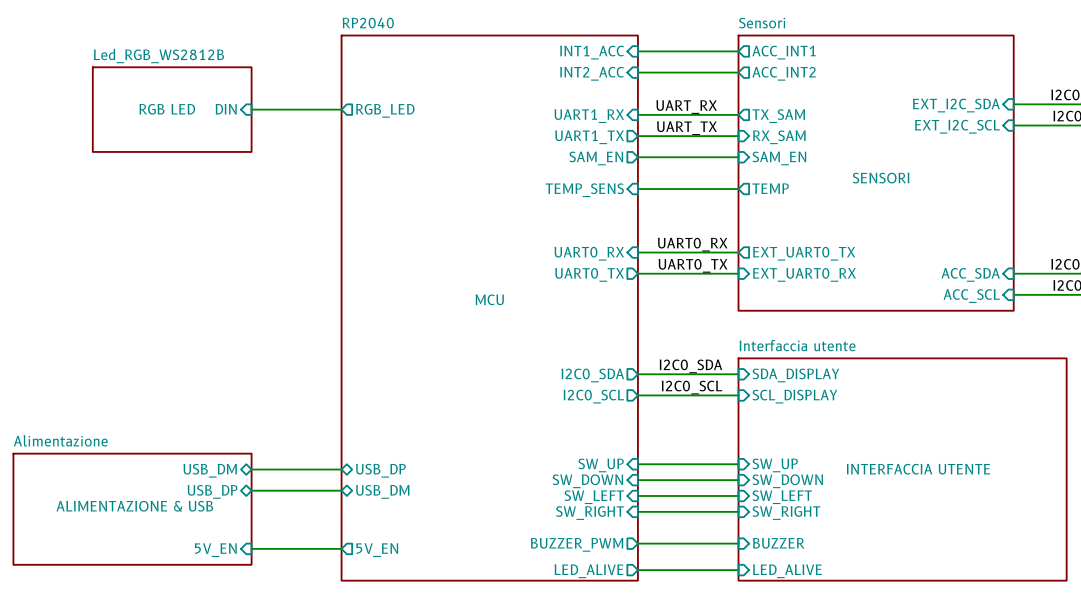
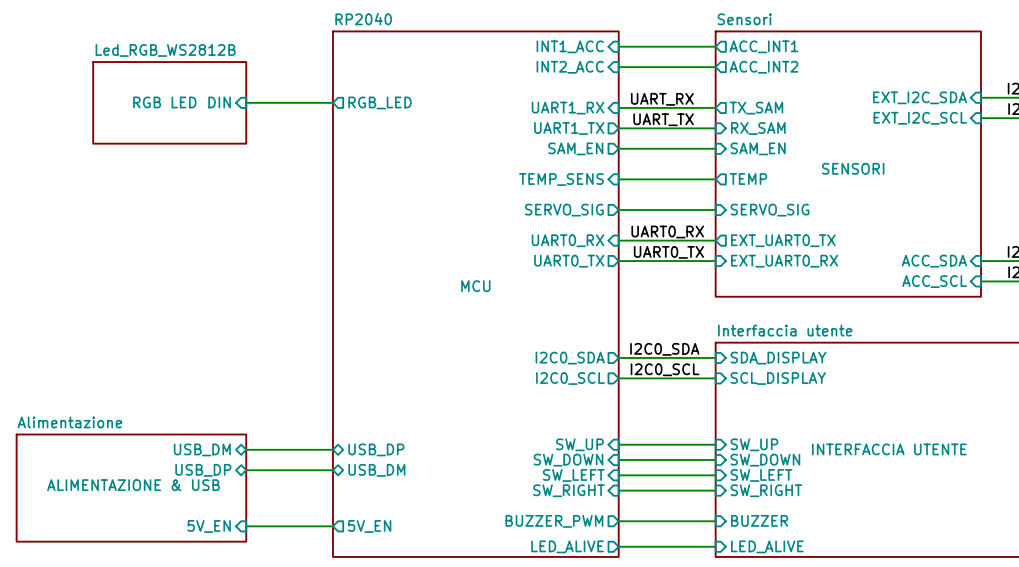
wire: none -> (618, 210) (715, 210)
sheet pin: none -> SERVO_SIG (564, 210)
sheet pin: none -> SERVO_SIG (770, 210)

